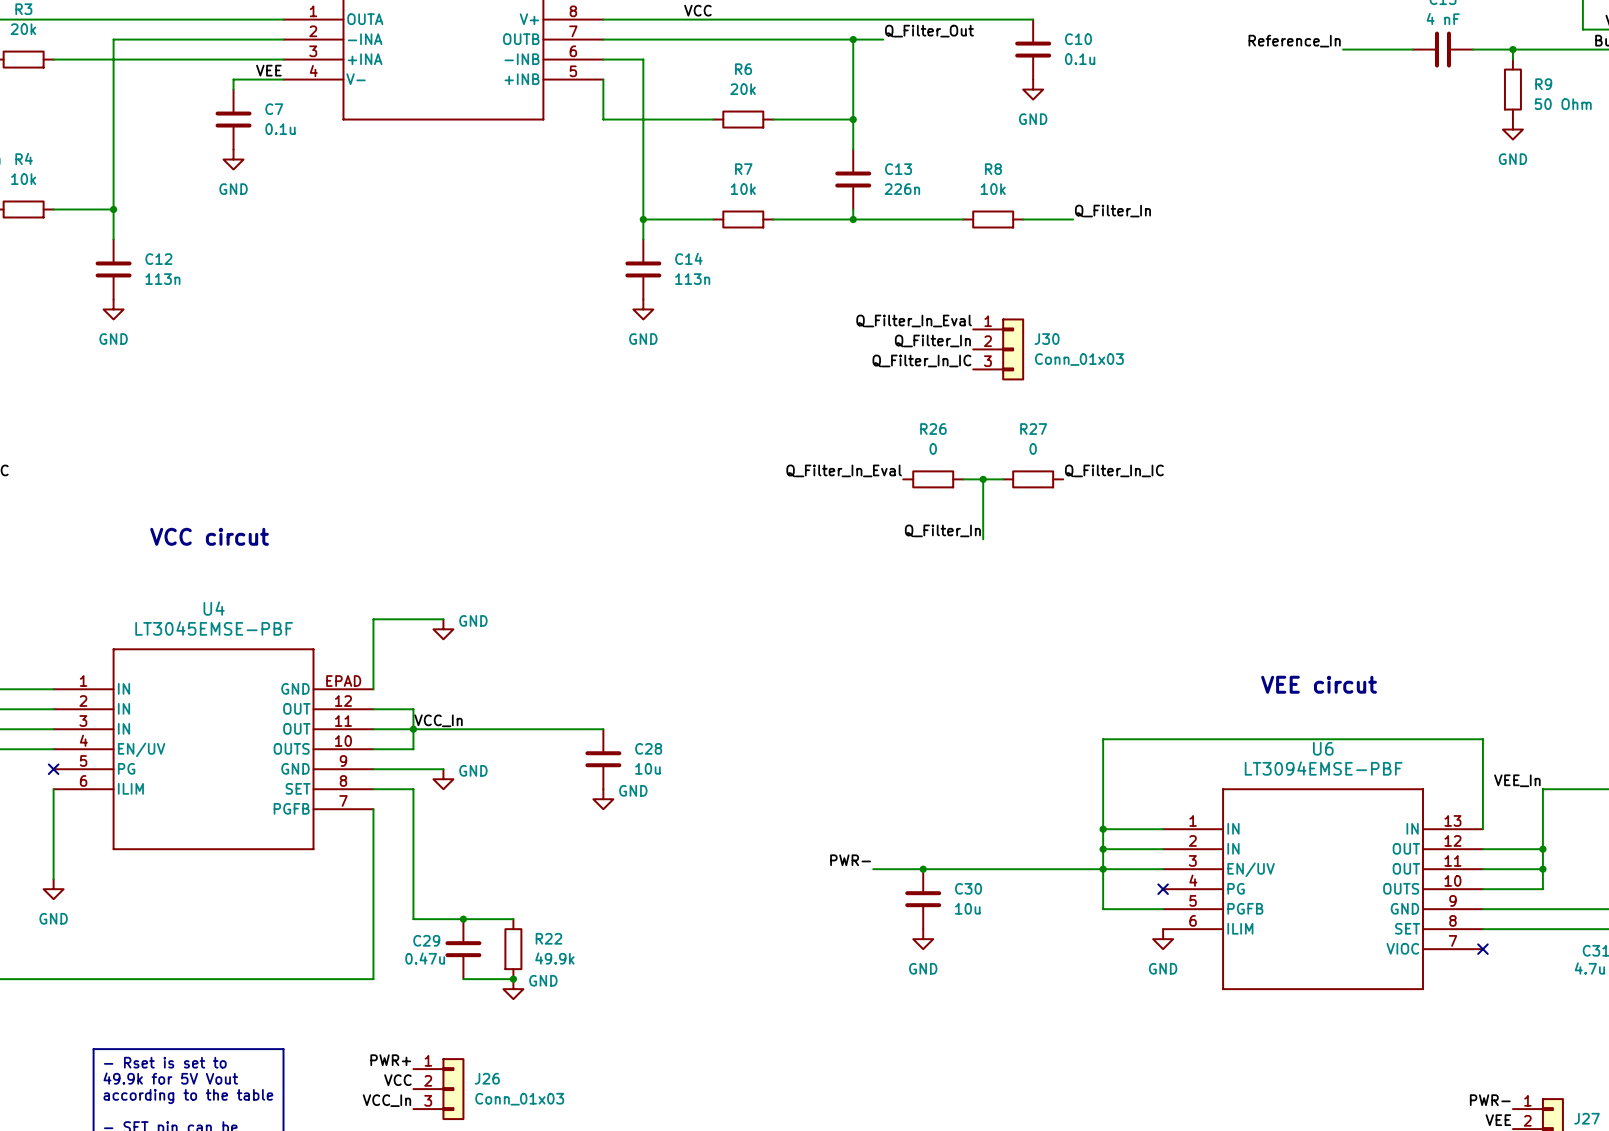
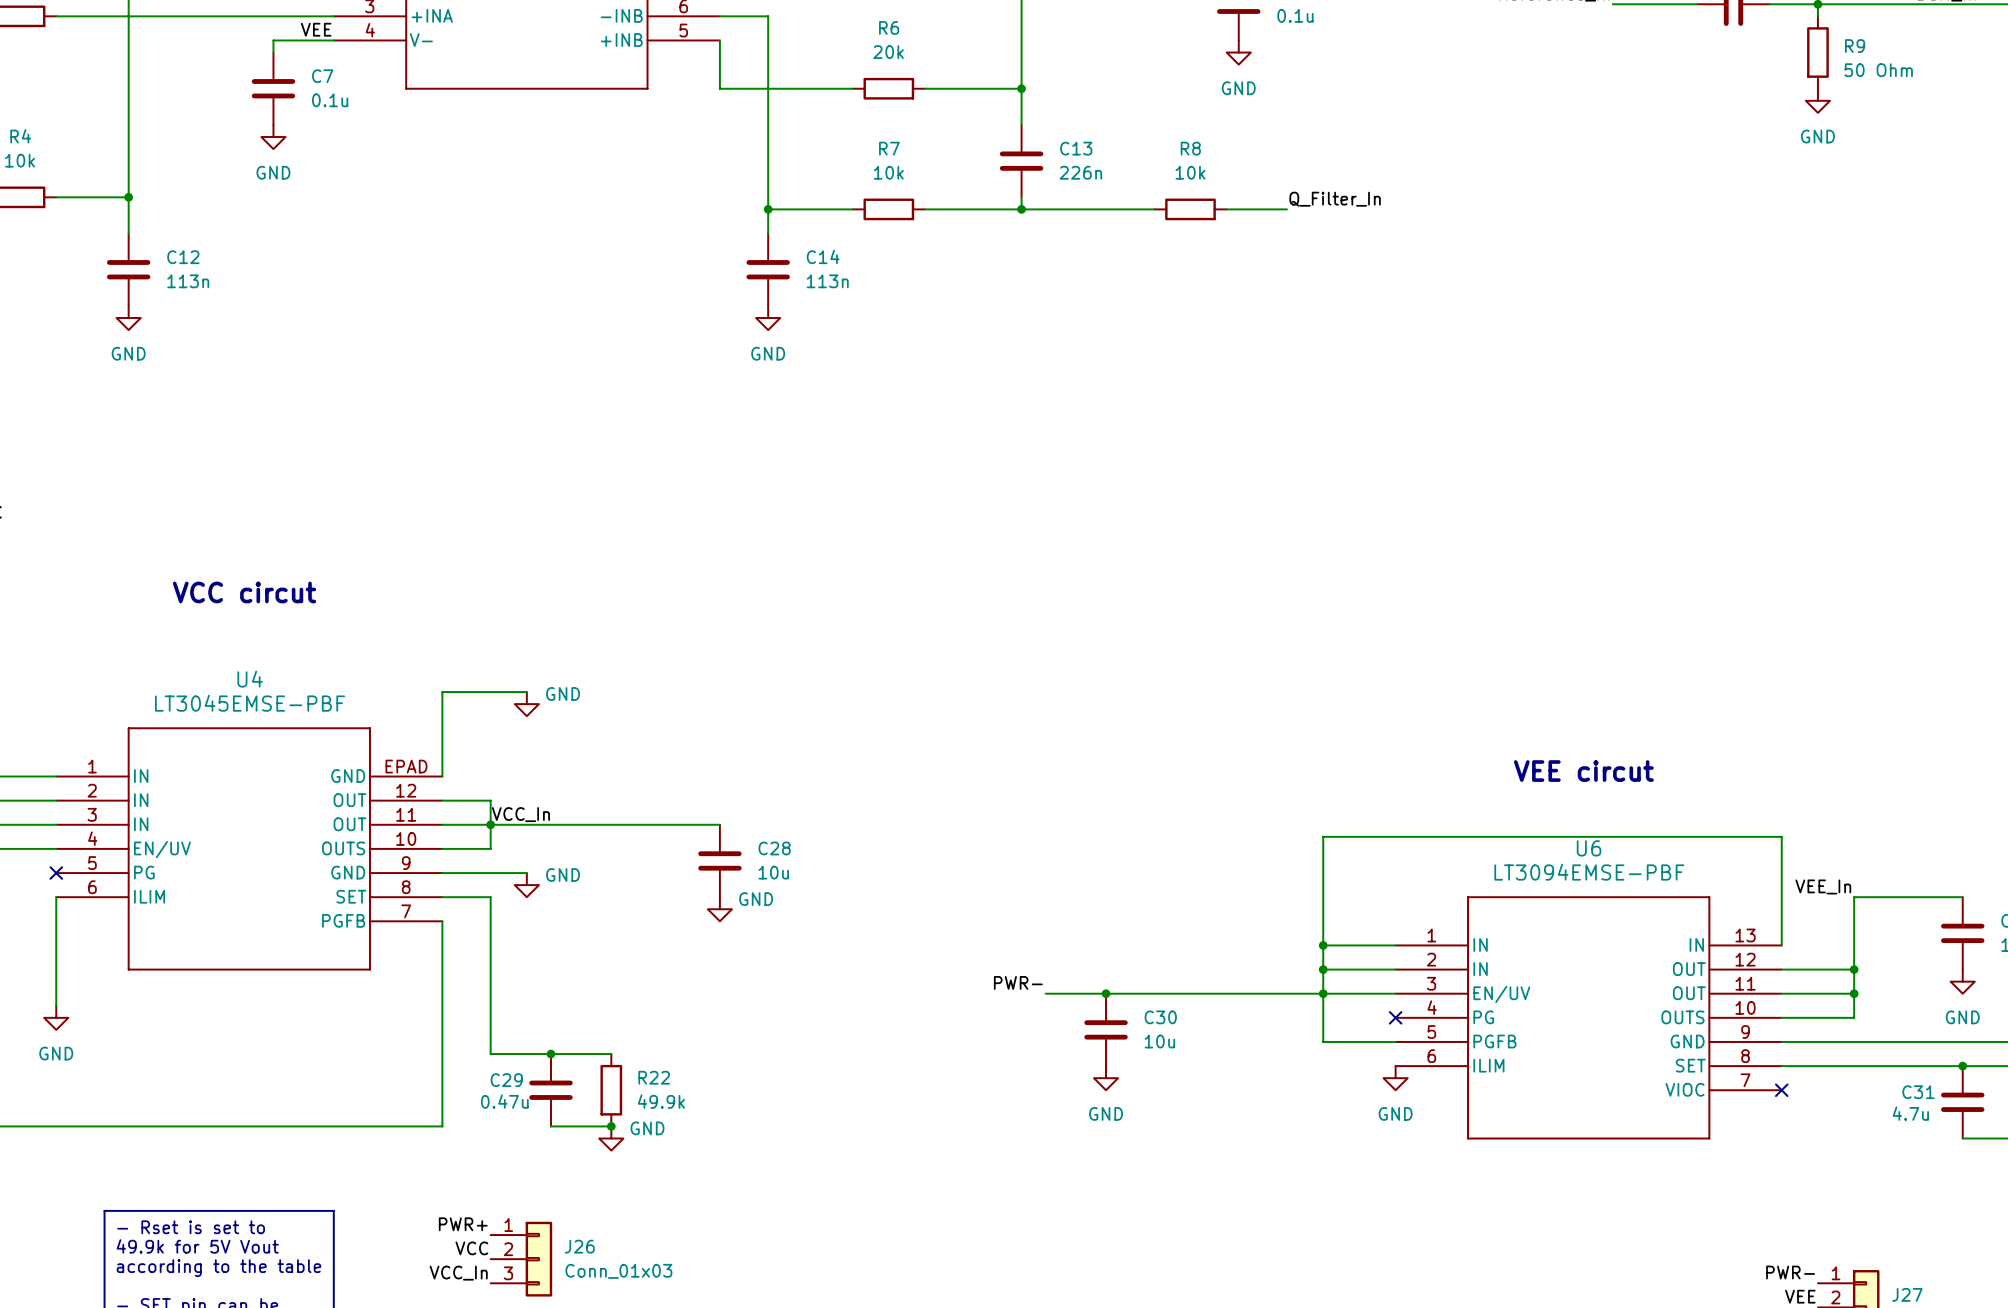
label: Q_Filter_In_Eval (914, 320) -> none
label: Q_Filter_In (932, 340) -> none
J30: Conn_01x03 (998, 349) -> none
label: Q_Filter_In_IC (921, 360) -> none
label: Q_Filter_In_Eval (844, 470) -> none
label: Q_Filter_In_IC (1114, 470) -> none
R26: 0 (933, 479) -> none
wire: (963, 479) (1003, 479) -> none
wire: (983, 479) (983, 539) -> none
junction: (983, 479) -> none
R27: 0 (1033, 479) -> none
label: Q_Filter_In (942, 530) -> none

